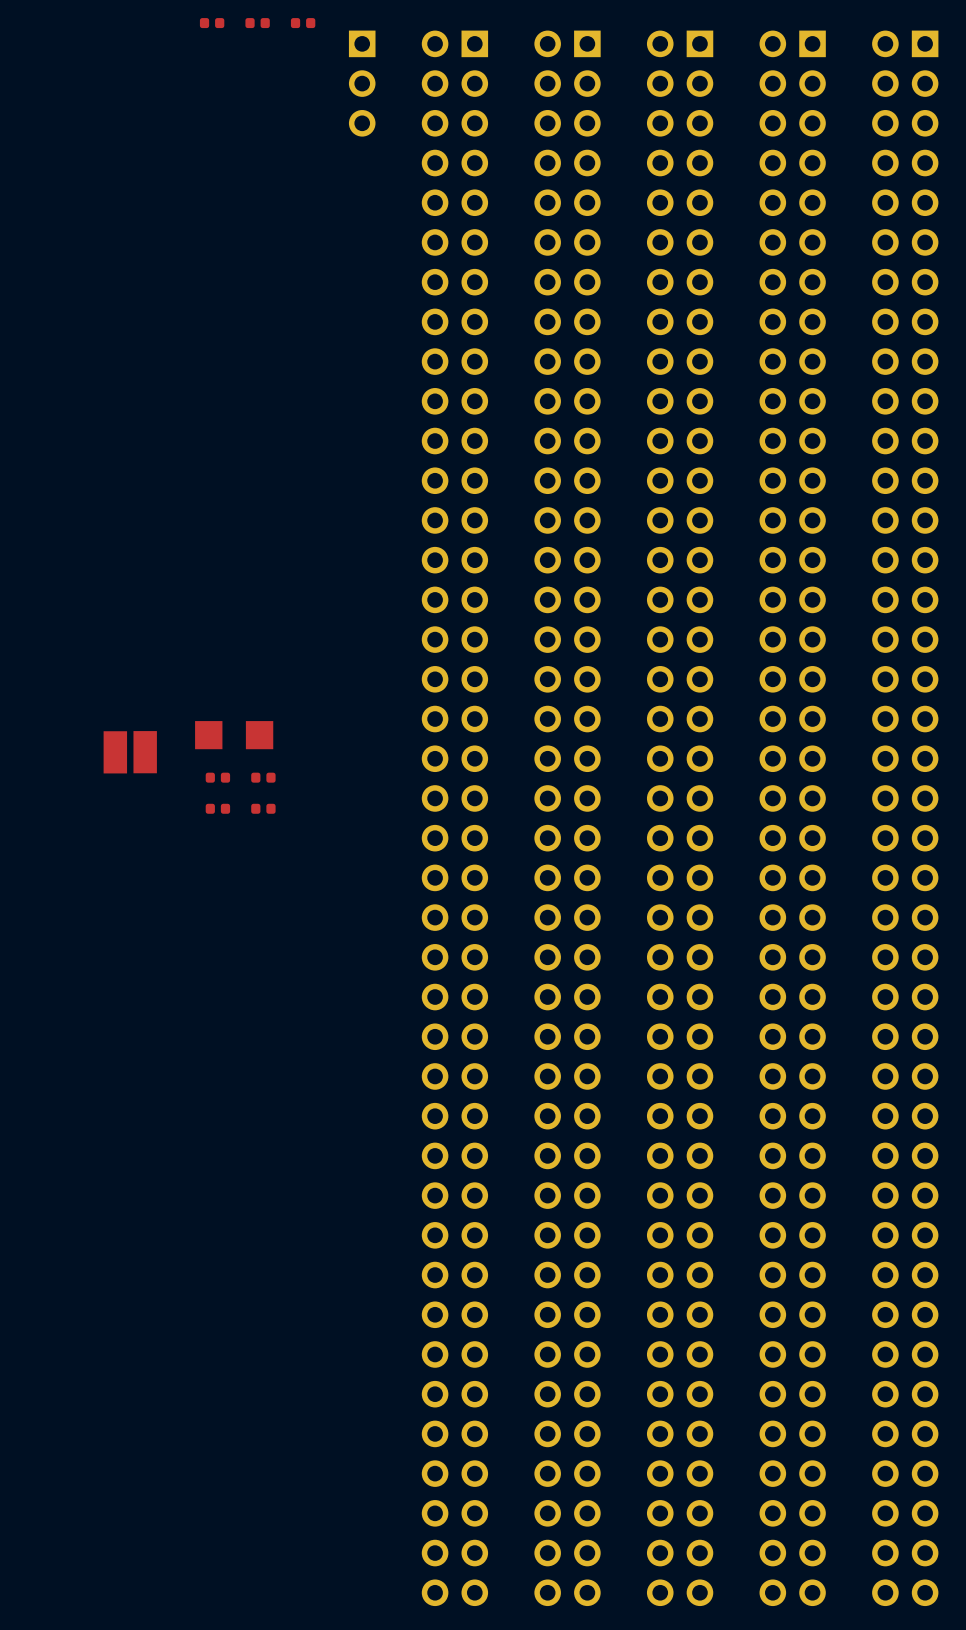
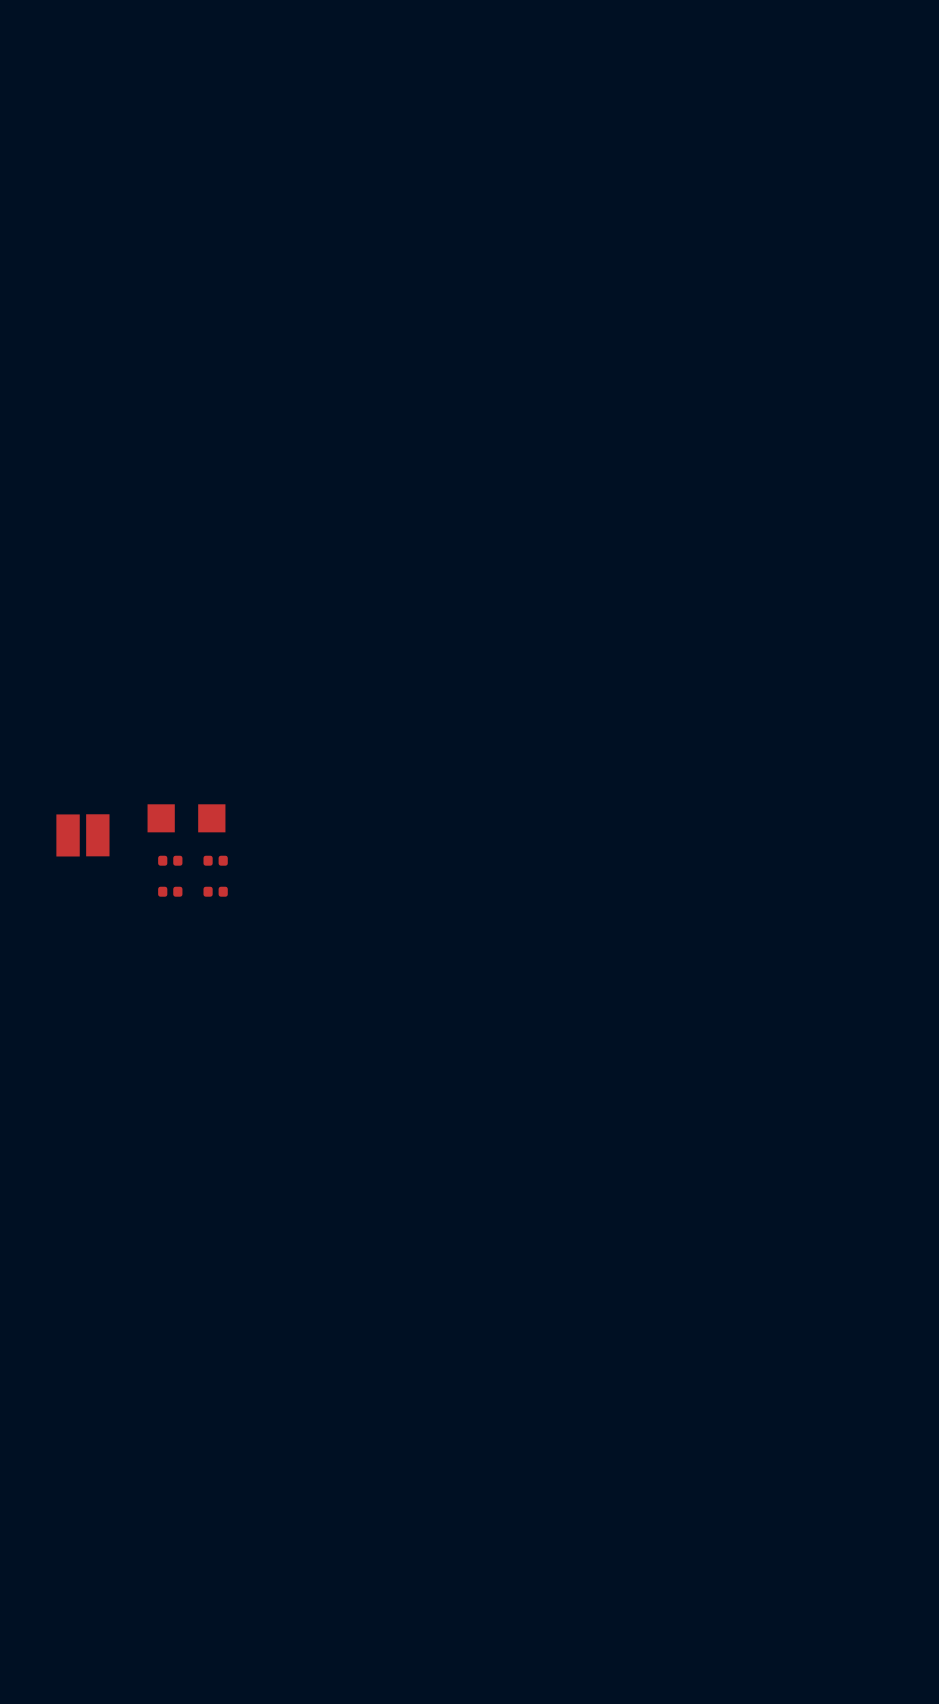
part: (212, 23) -> none
part: (257, 23) -> none
part: (303, 23) -> none
part: (362, 83) -> none
part: (454, 818) -> none
part: (567, 818) -> none
part: (680, 818) -> none
part: (792, 818) -> none
part: (905, 818) -> none

